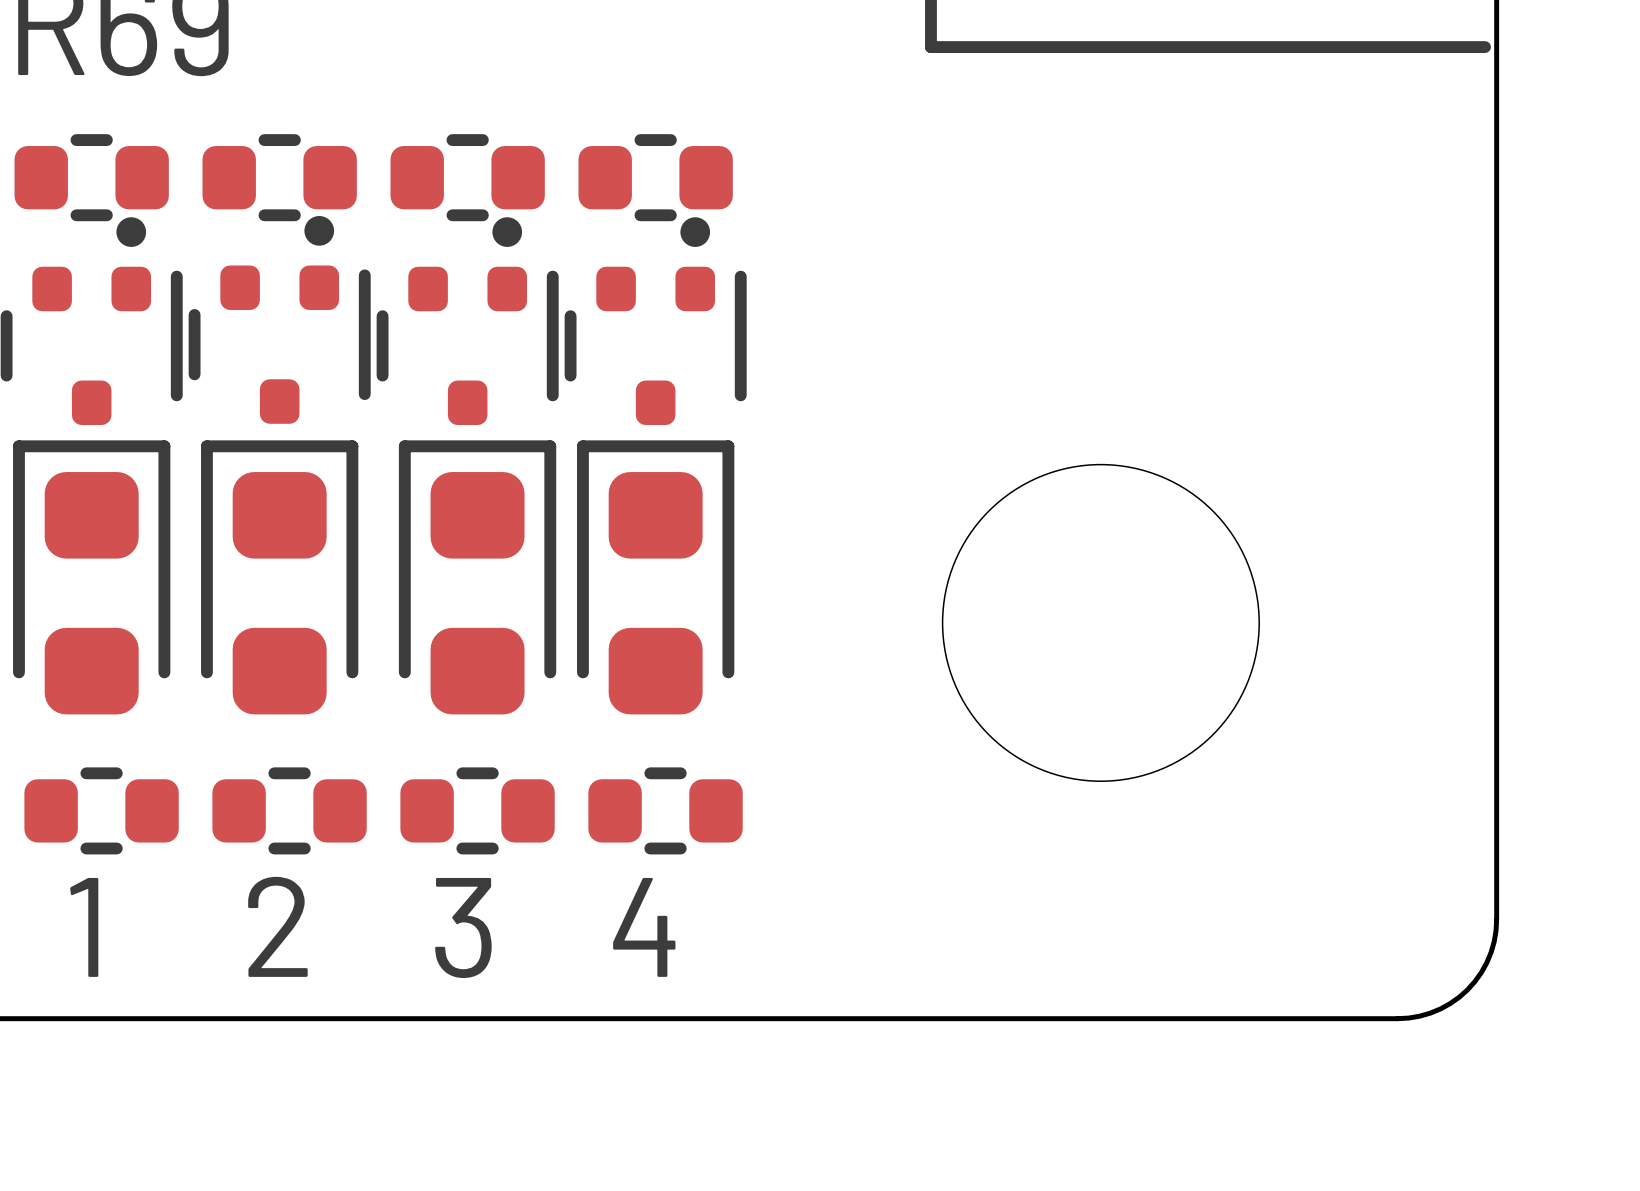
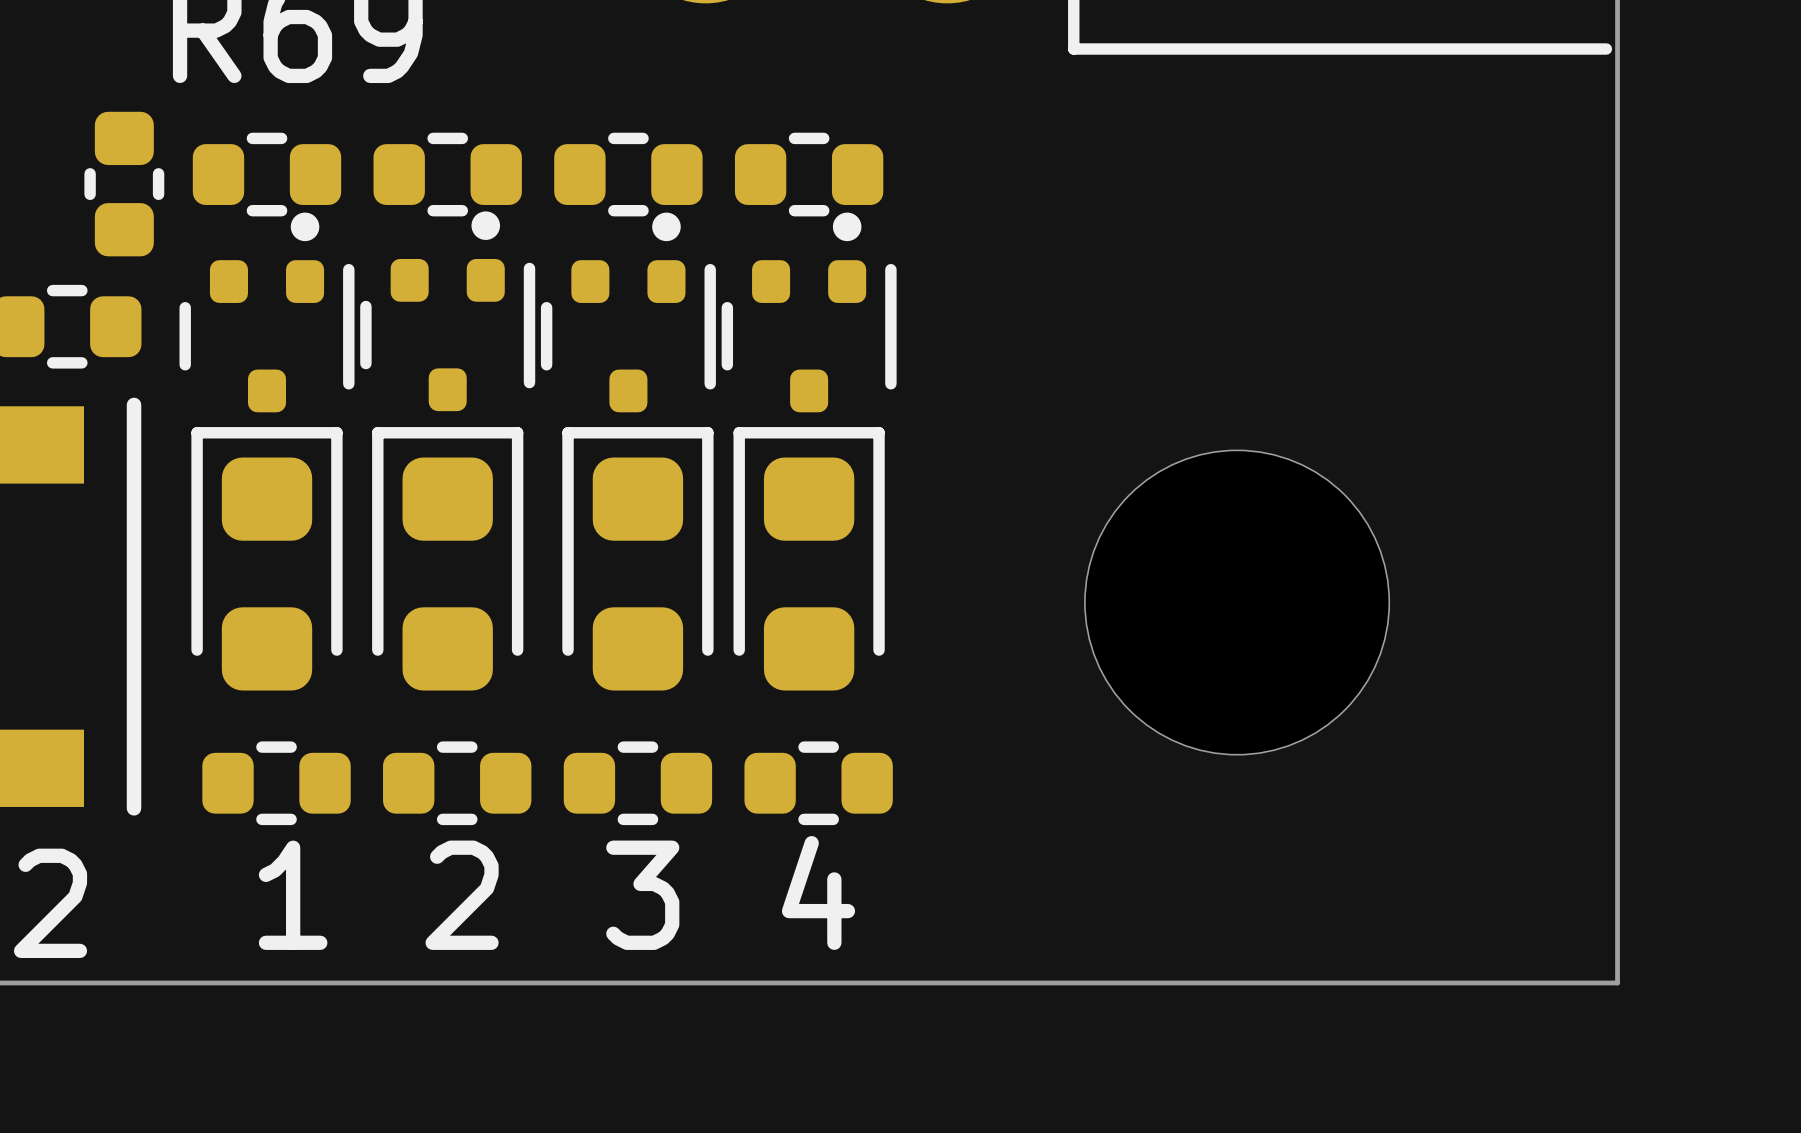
board edge: (1496, 919) (1491, 952) (1481, 972) (1467, 989) (1440, 1008) (1419, 1016) (1397, 1018) -> (1617, 887) (1617, 982) (1522, 982)

